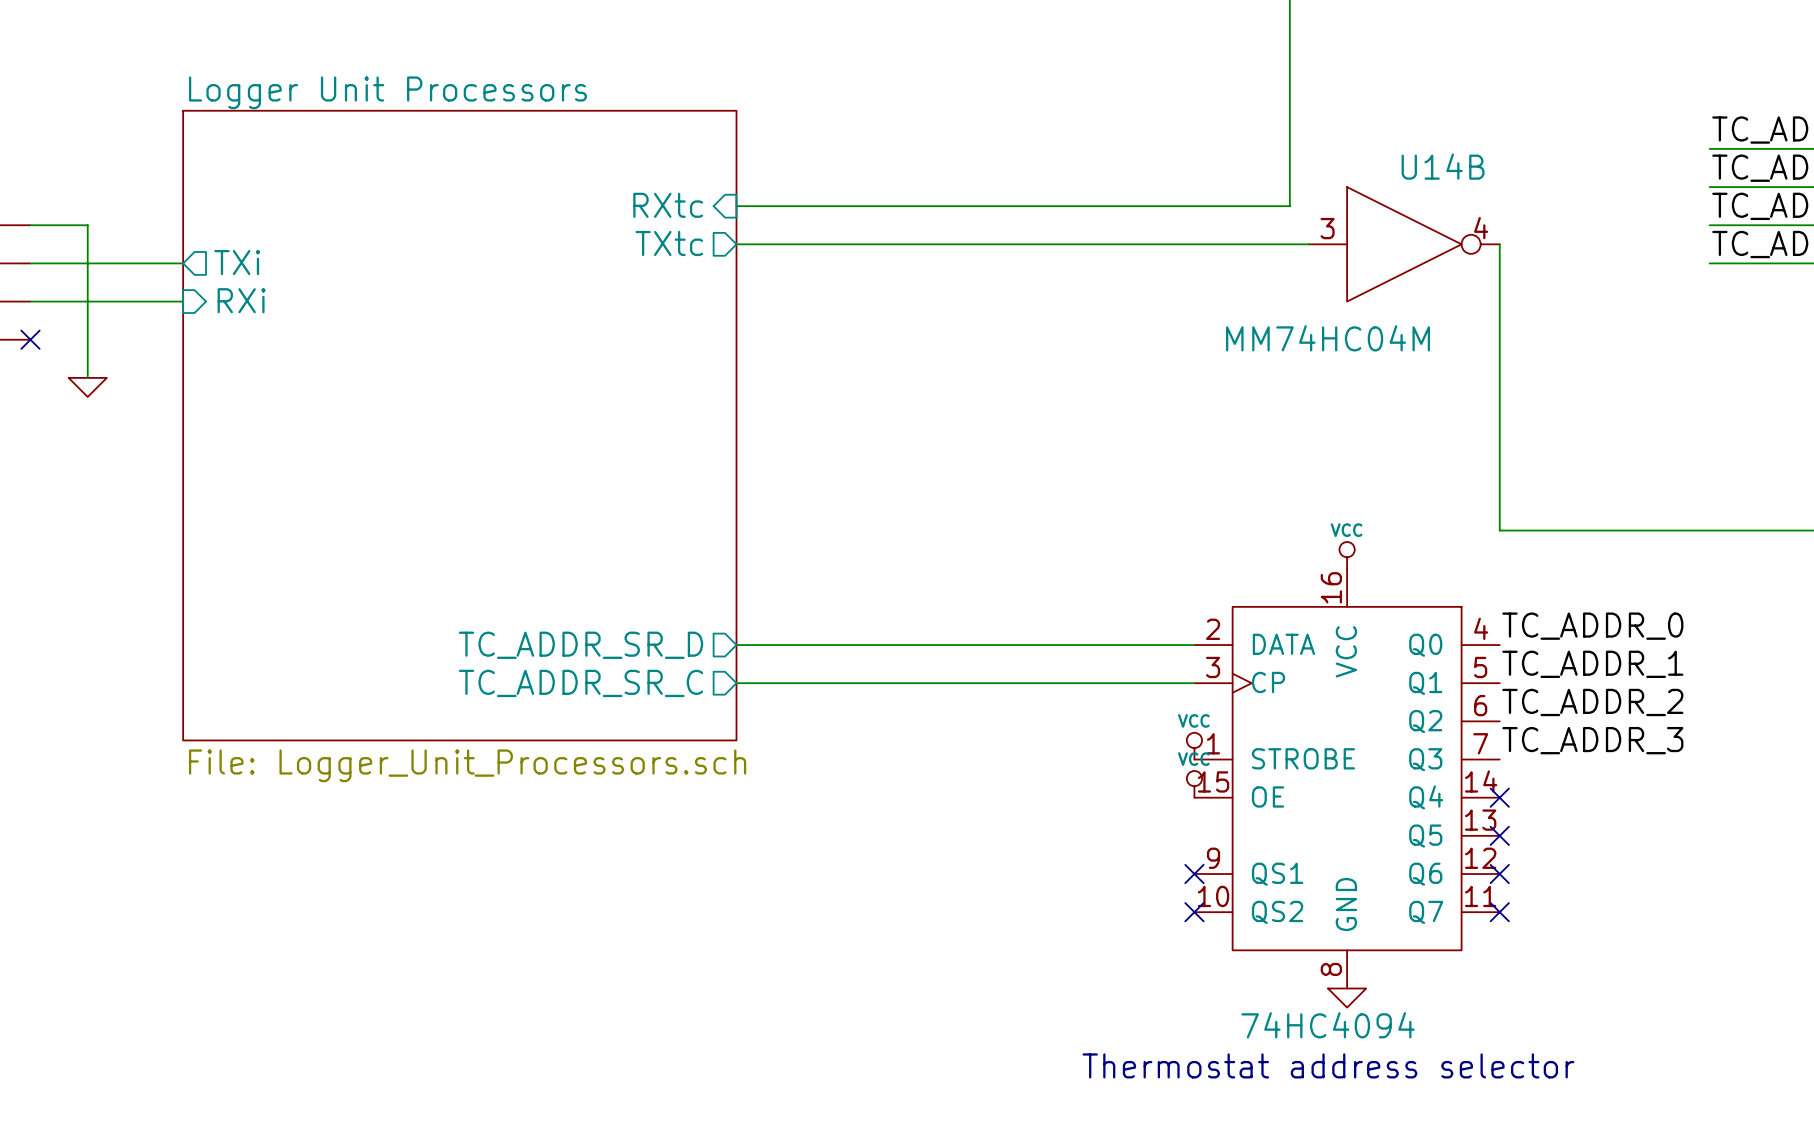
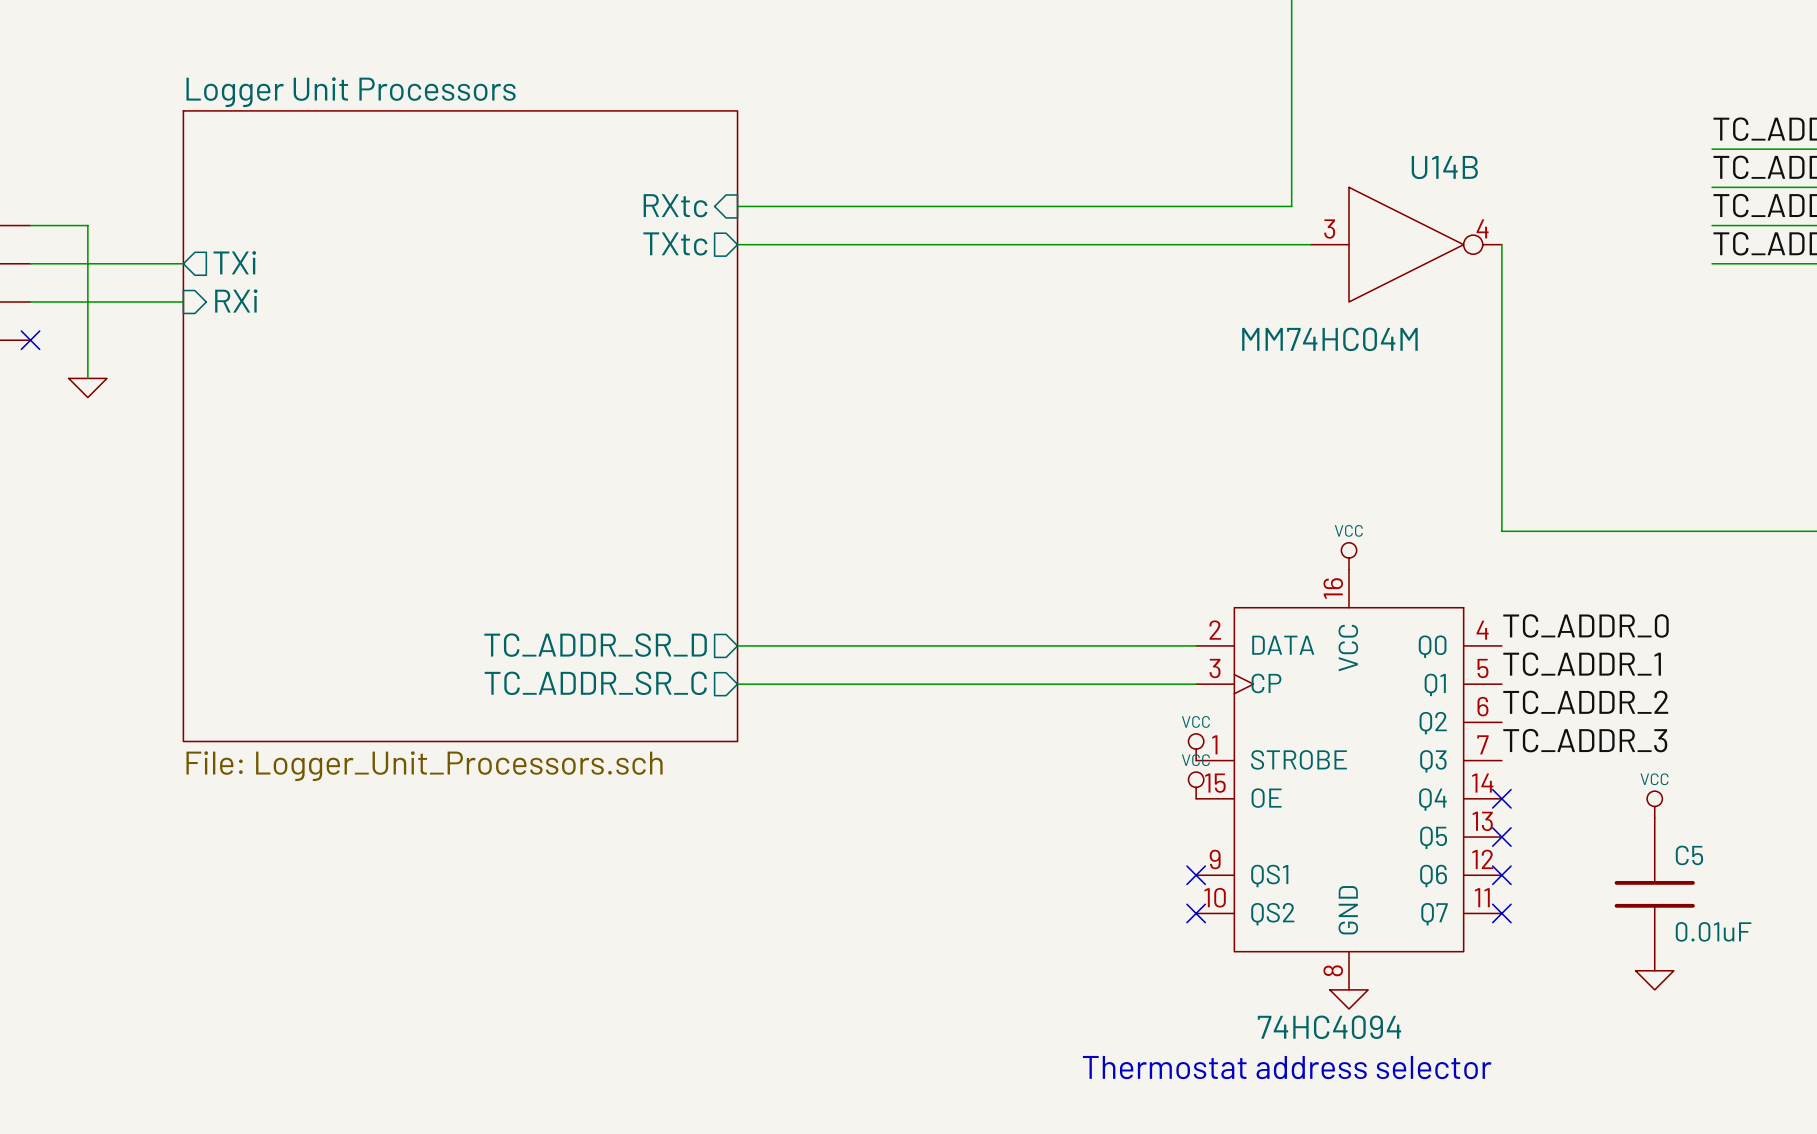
power symbol: none -> VCC (1654, 804)
C5: none -> 0.01uF (1654, 894)
power symbol: none -> (1654, 980)

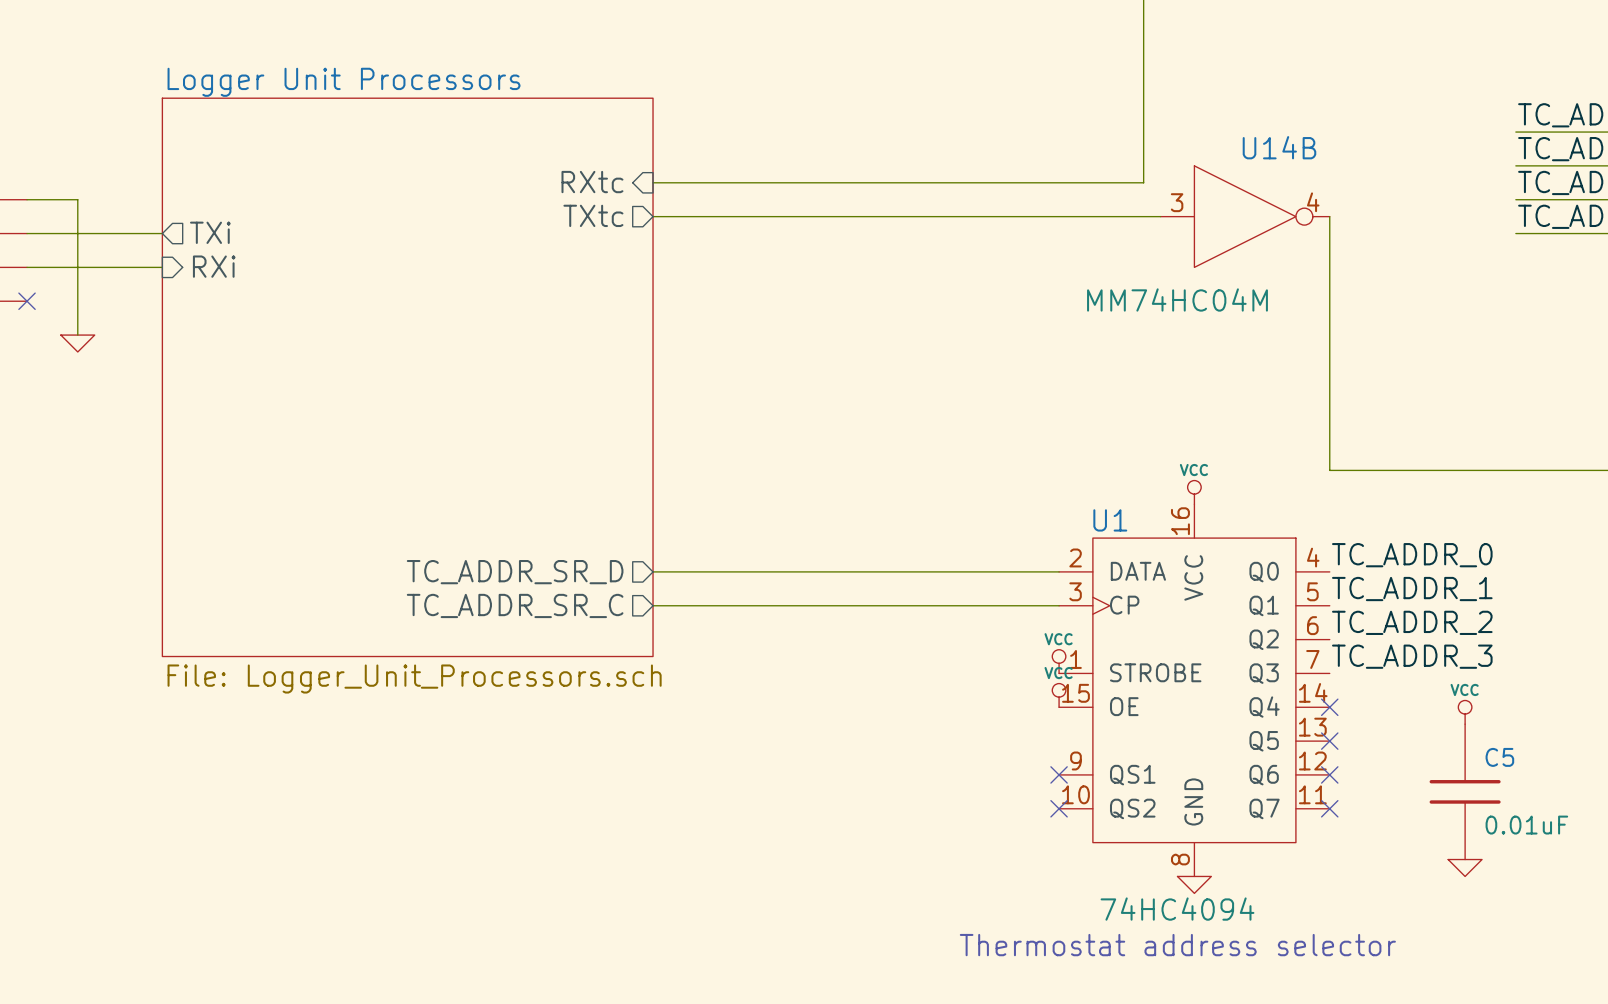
U1: none -> 74HC4094 (1194, 690)

